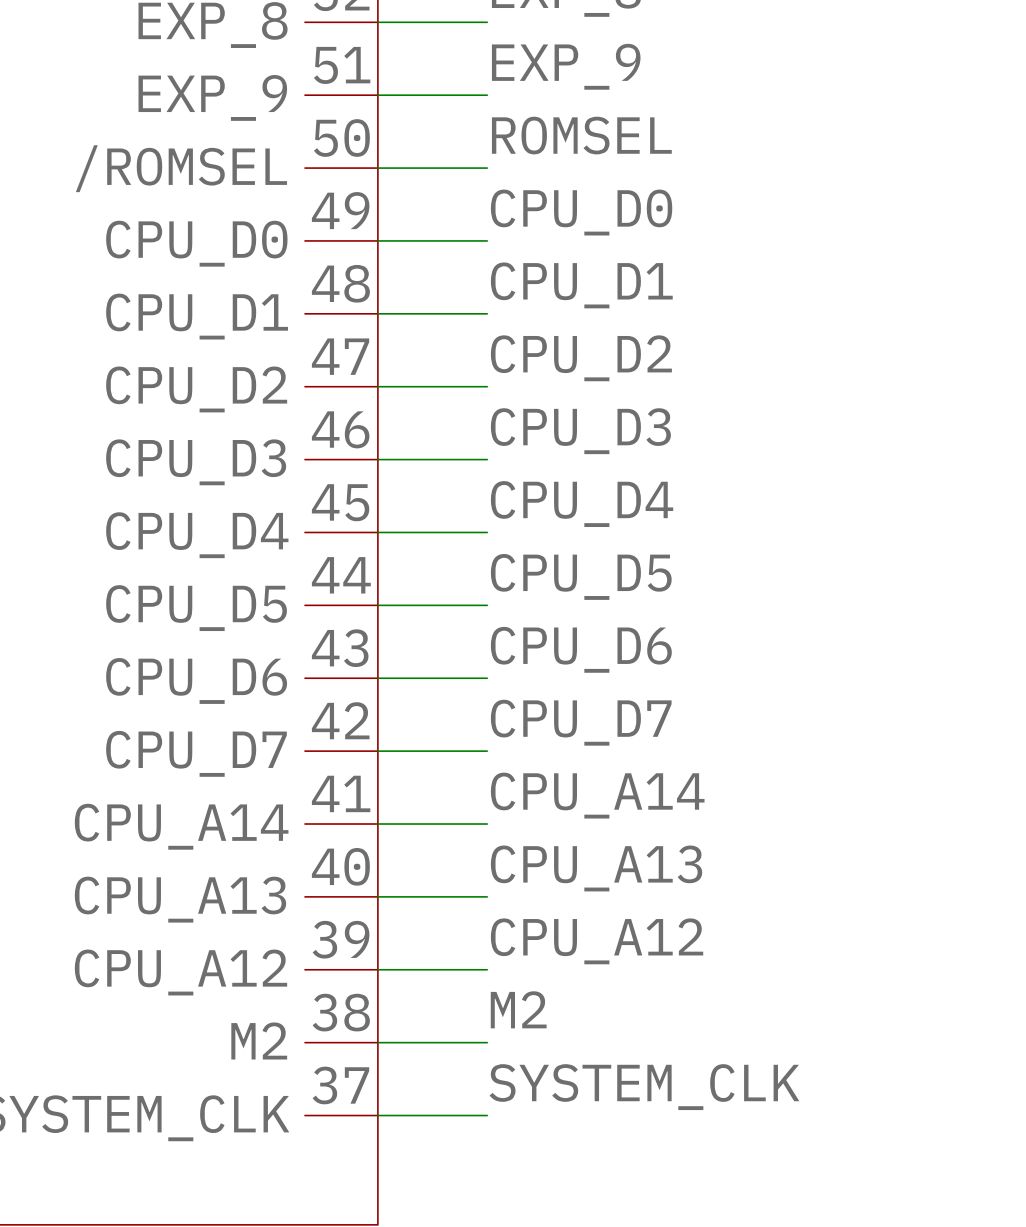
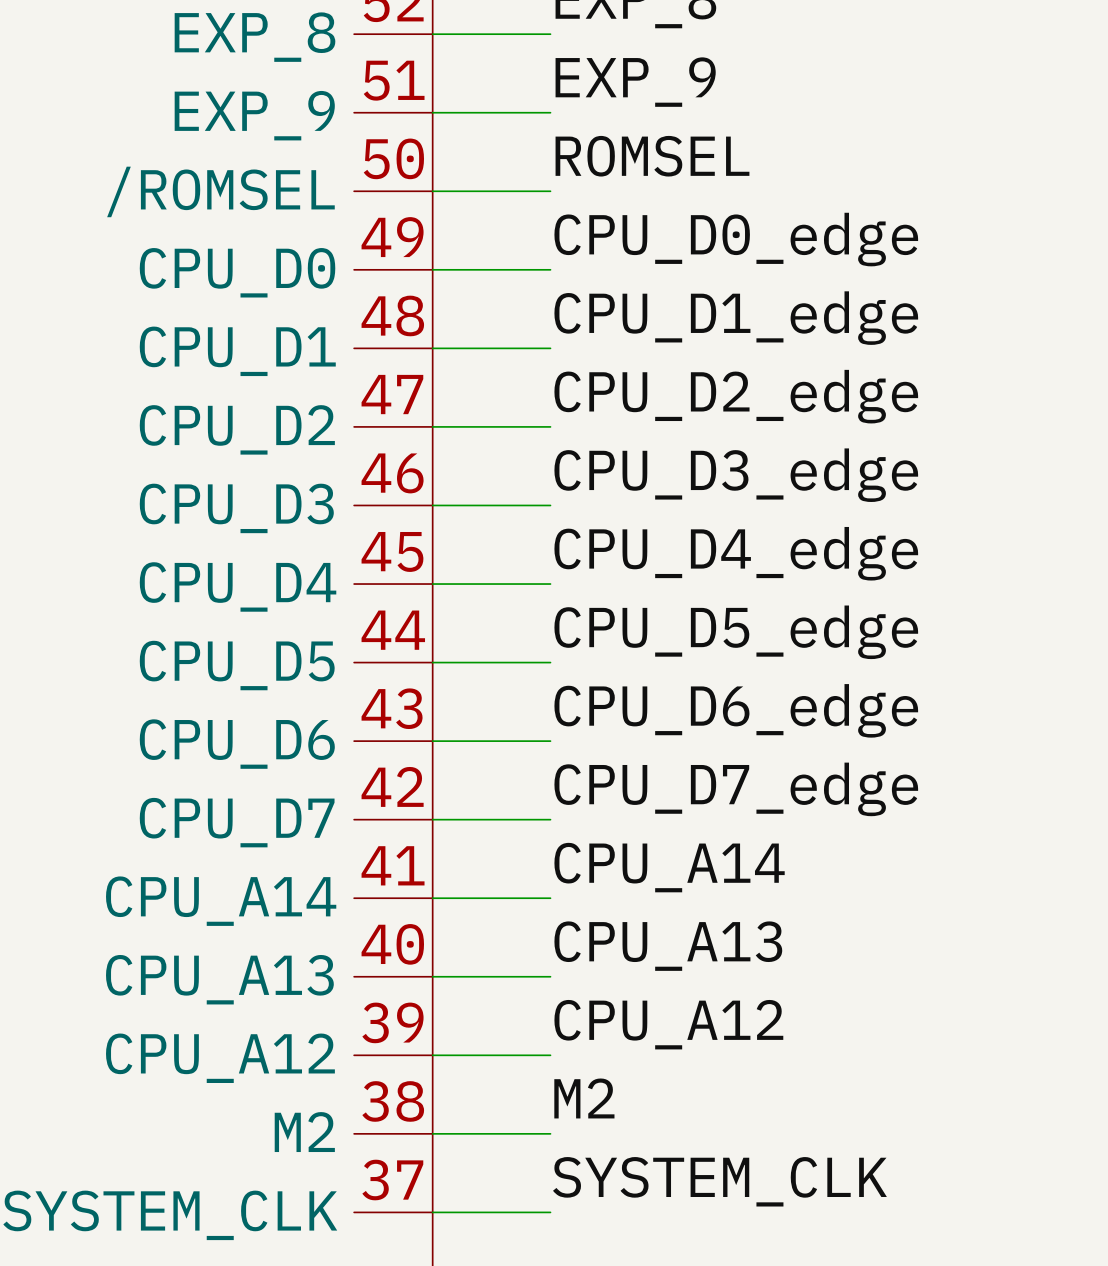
label: CPU_D0 (581, 212) -> CPU_D0_edge (736, 239)
label: CPU_D1 (581, 285) -> CPU_D1_edge (736, 318)
label: CPU_D2 (581, 358) -> CPU_D2_edge (736, 396)
label: CPU_D3 (580, 431) -> CPU_D3_edge (736, 475)
label: CPU_D4 (582, 504) -> CPU_D4_edge (736, 553)
label: CPU_D5 (581, 576) -> CPU_D5_edge (736, 632)
label: CPU_D6 (581, 649) -> CPU_D6_edge (736, 710)
label: CPU_D7 (581, 722) -> CPU_D7_edge (736, 789)

